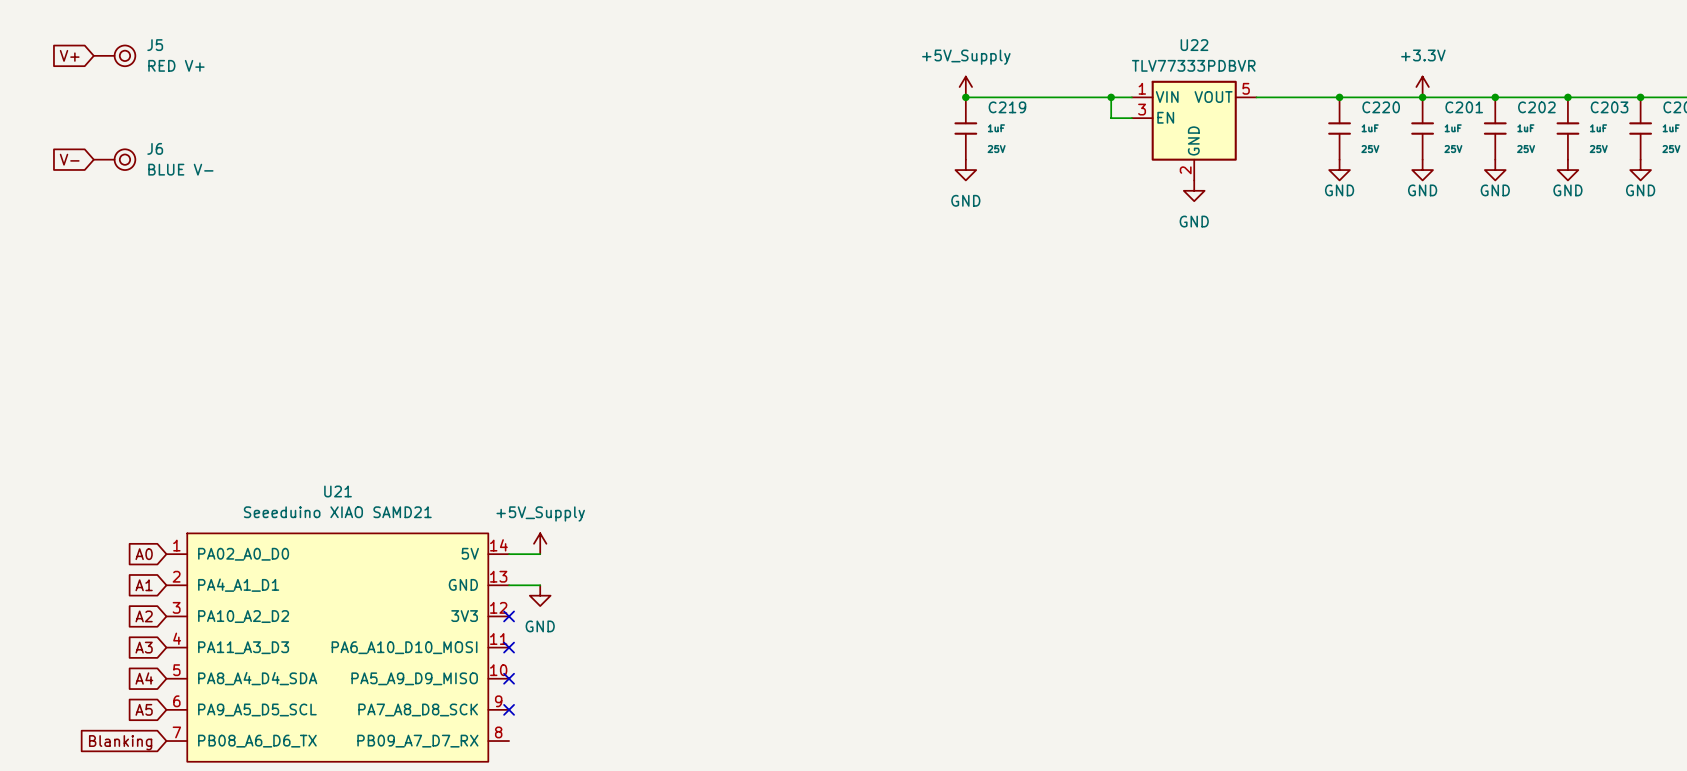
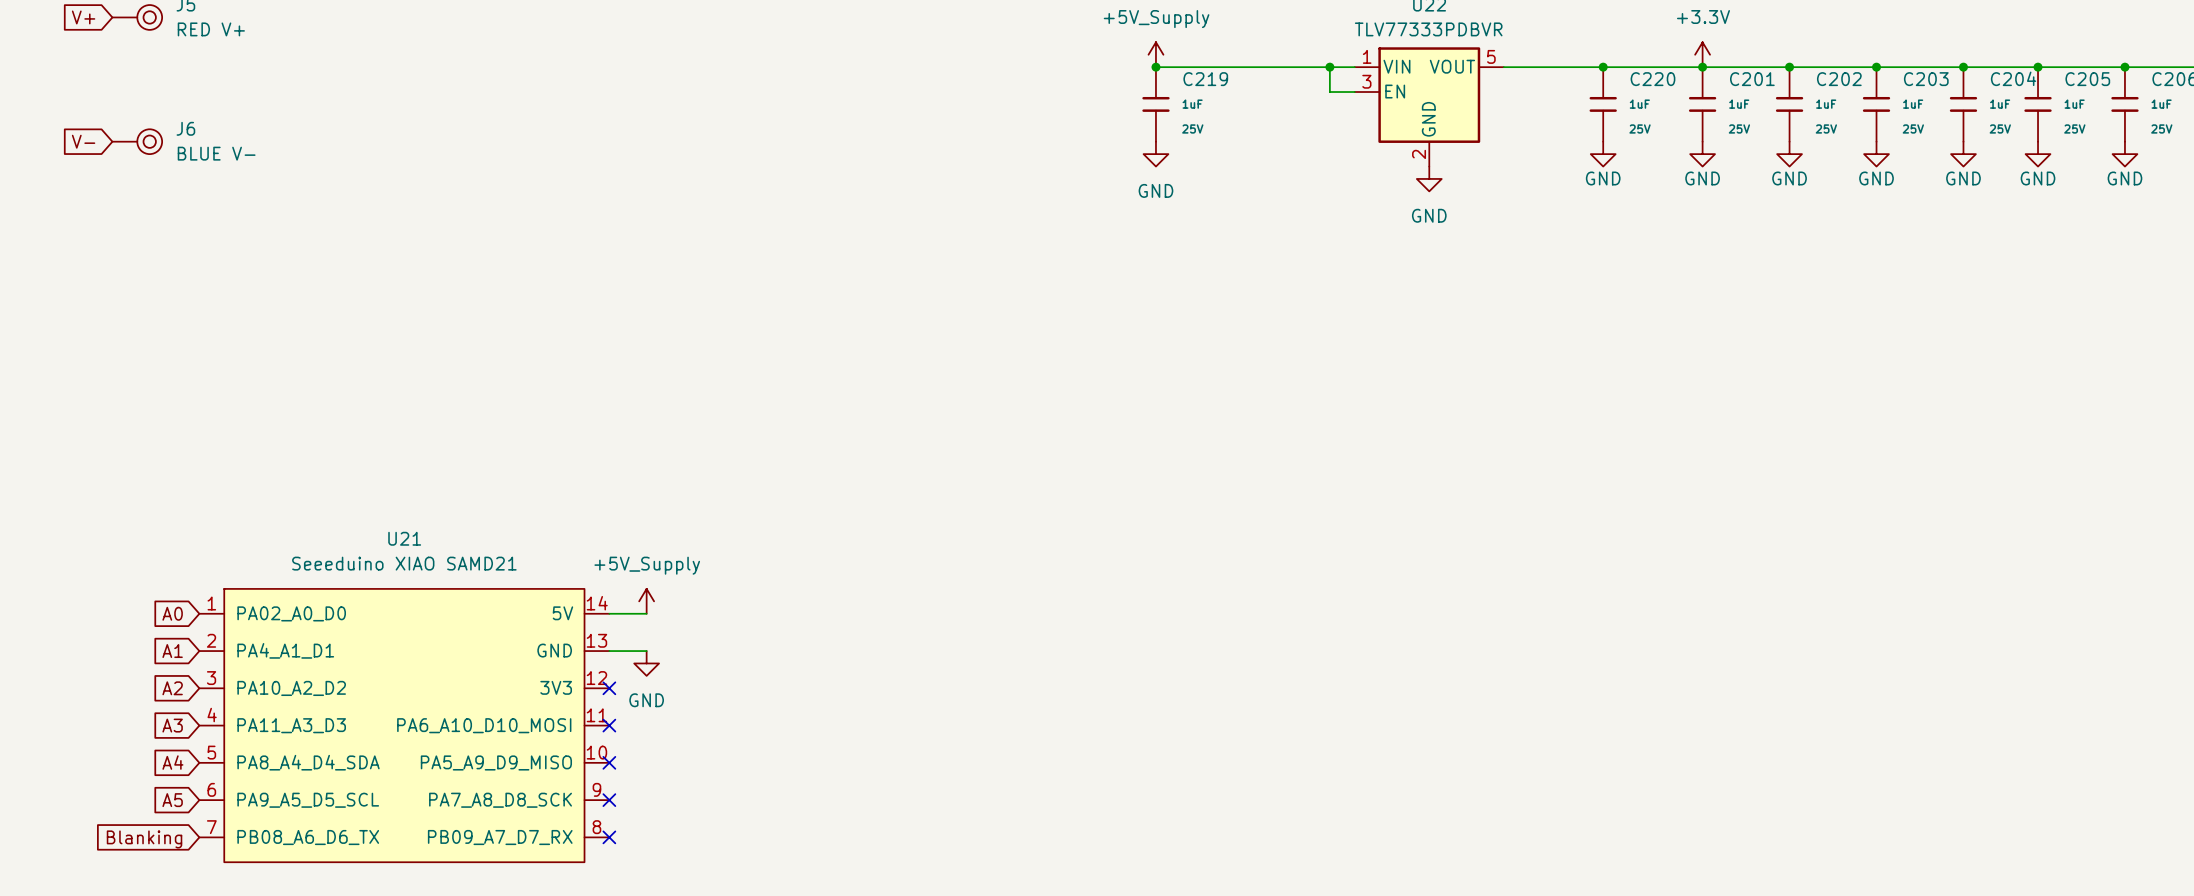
no-connect mark: none -> (609, 837)

